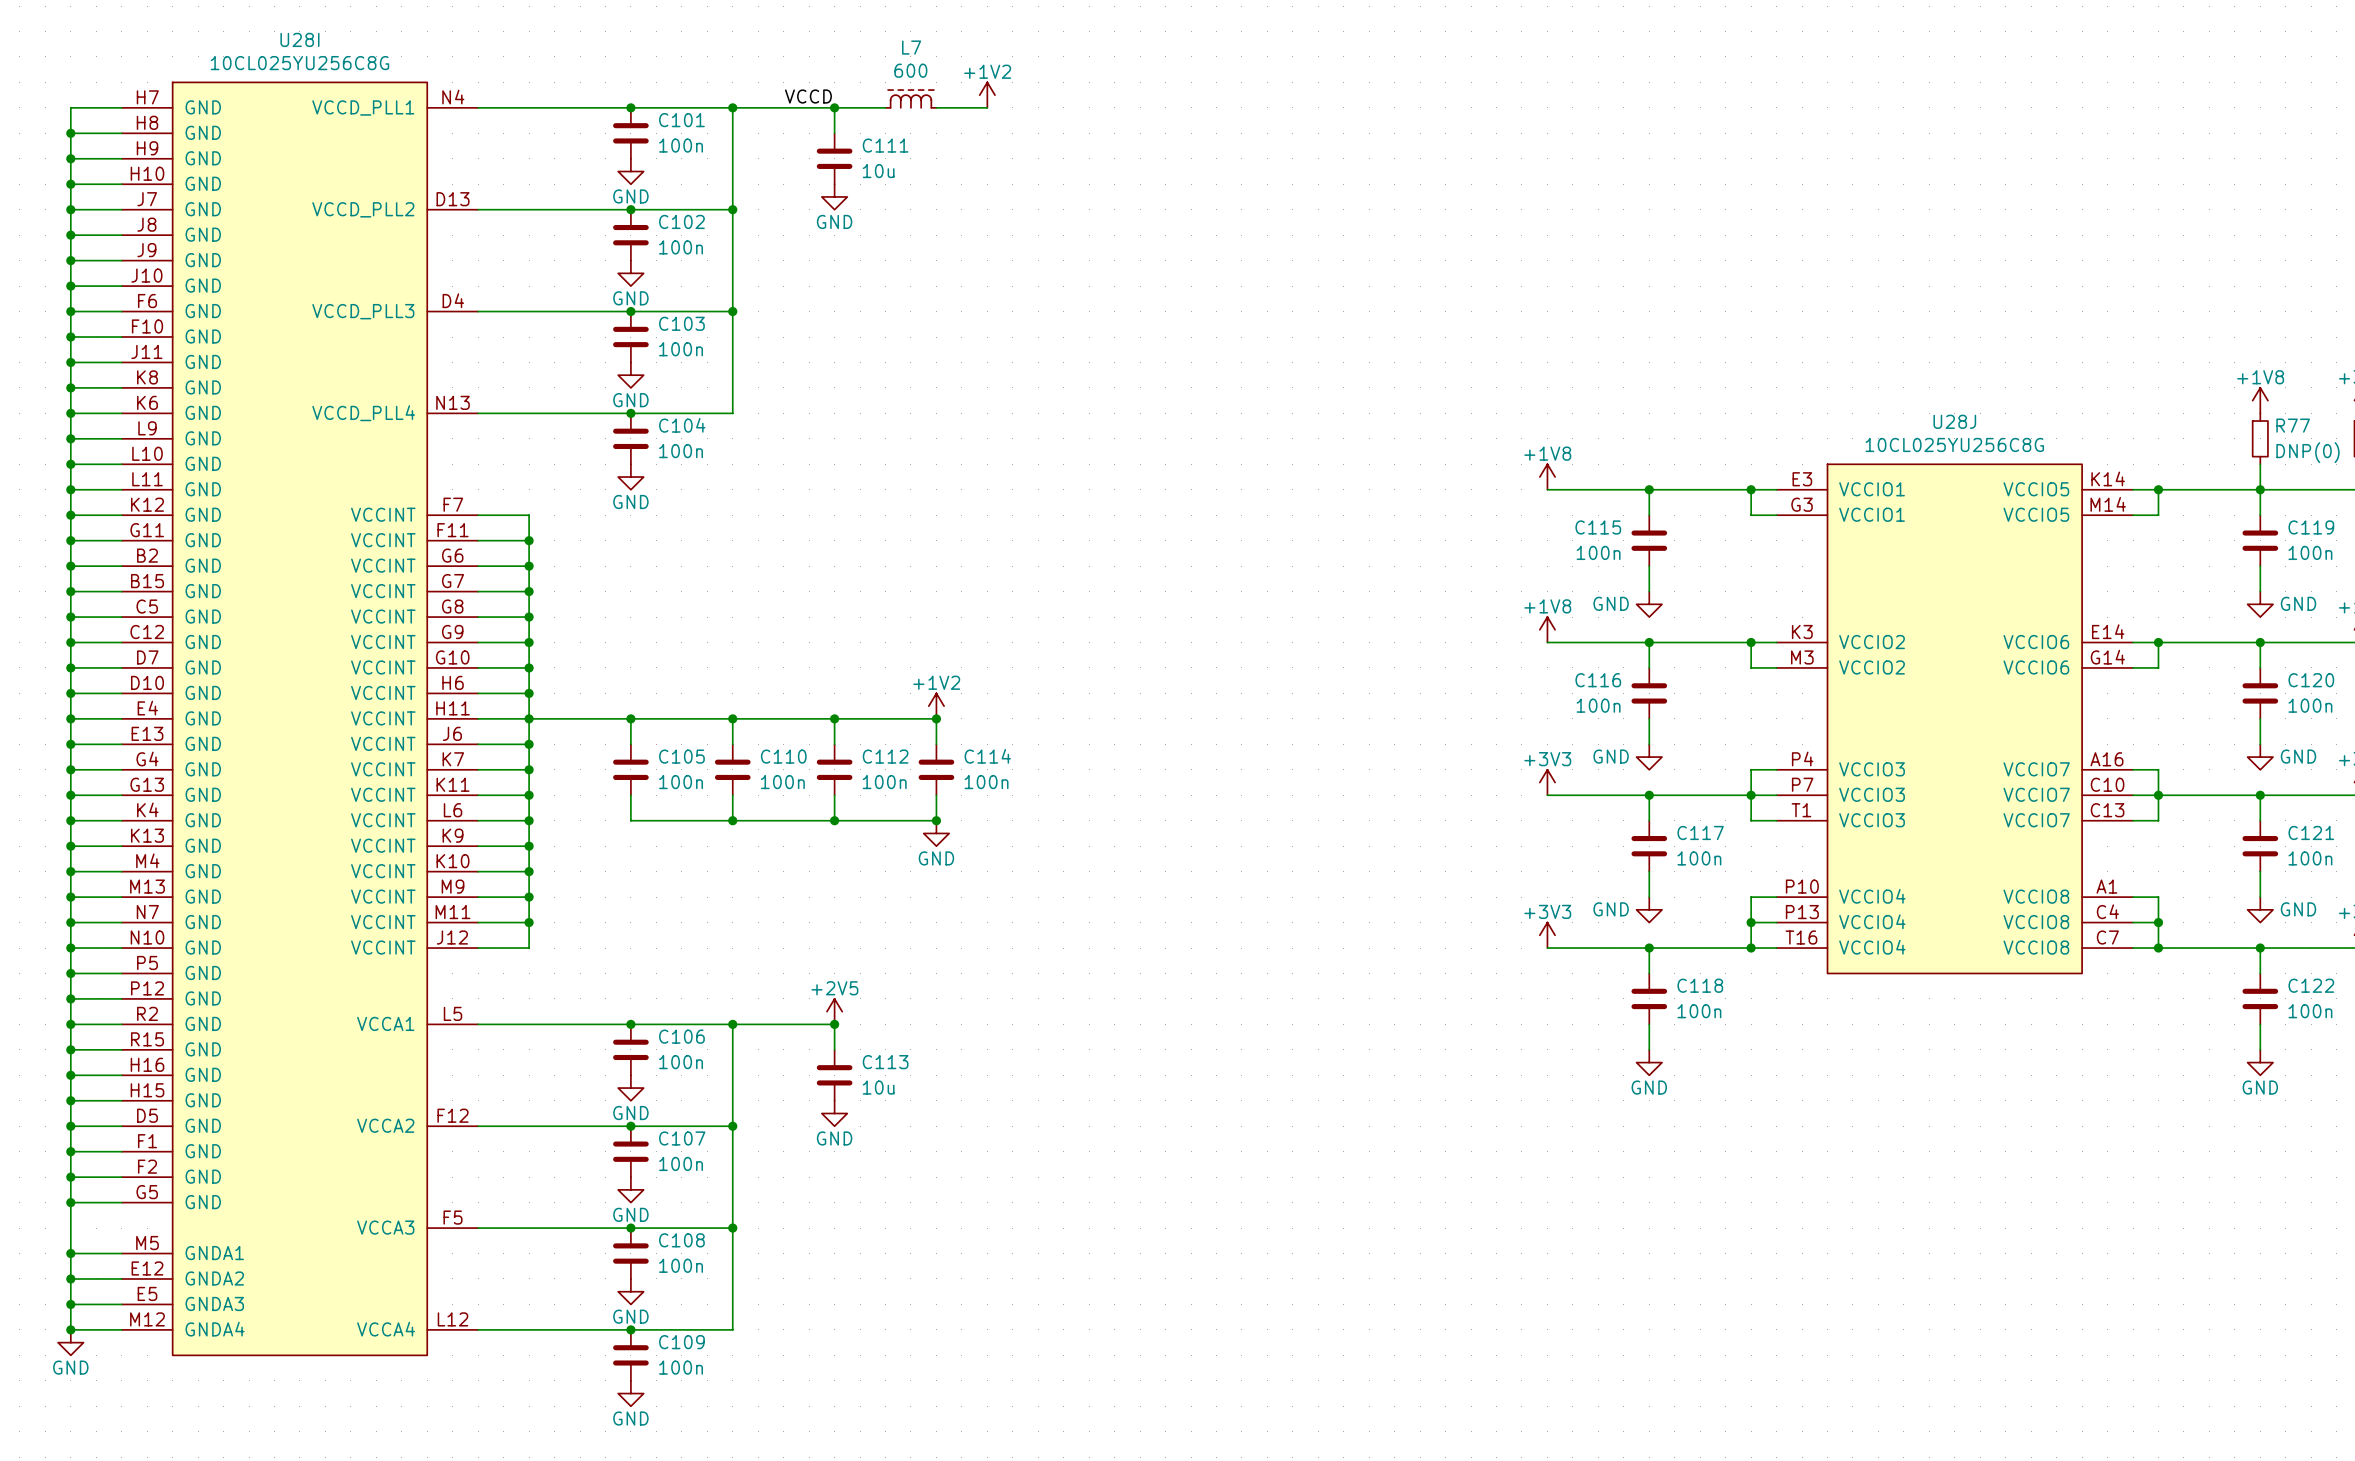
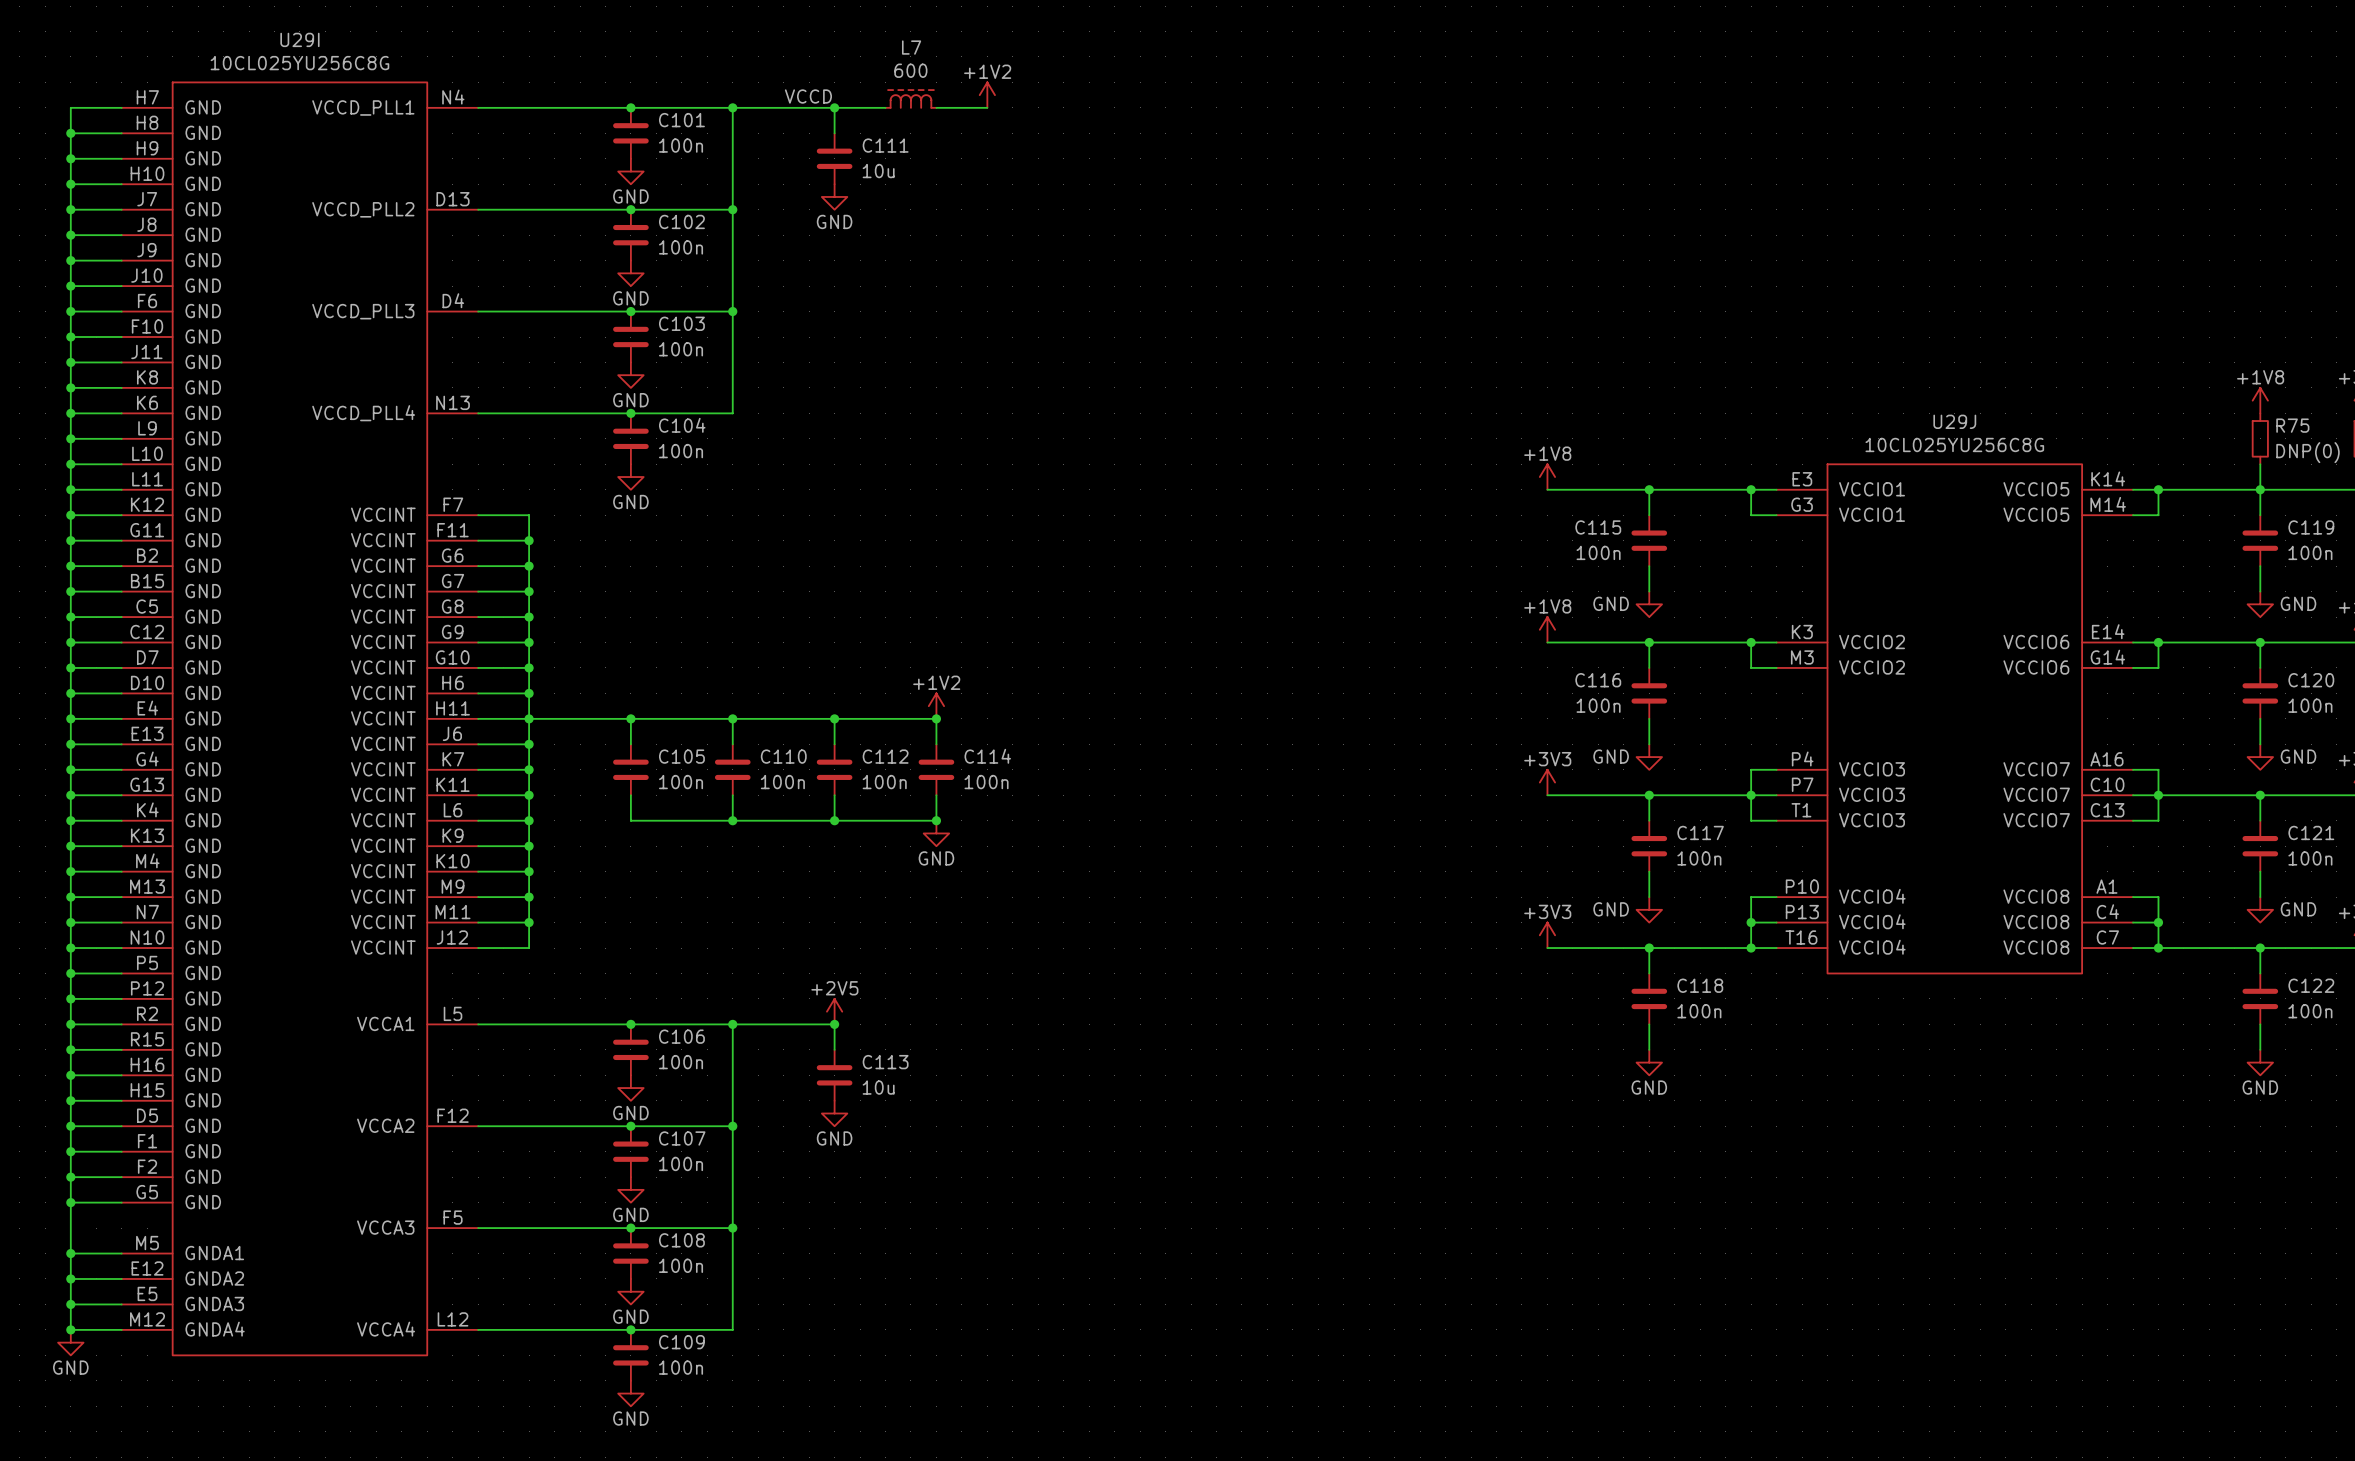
U28I name: U28I (299, 39) -> U29I (299, 39)
U28J name: U28J (1954, 421) -> U29J (1954, 421)
R77 name: R77 (2293, 425) -> R75 (2292, 425)

